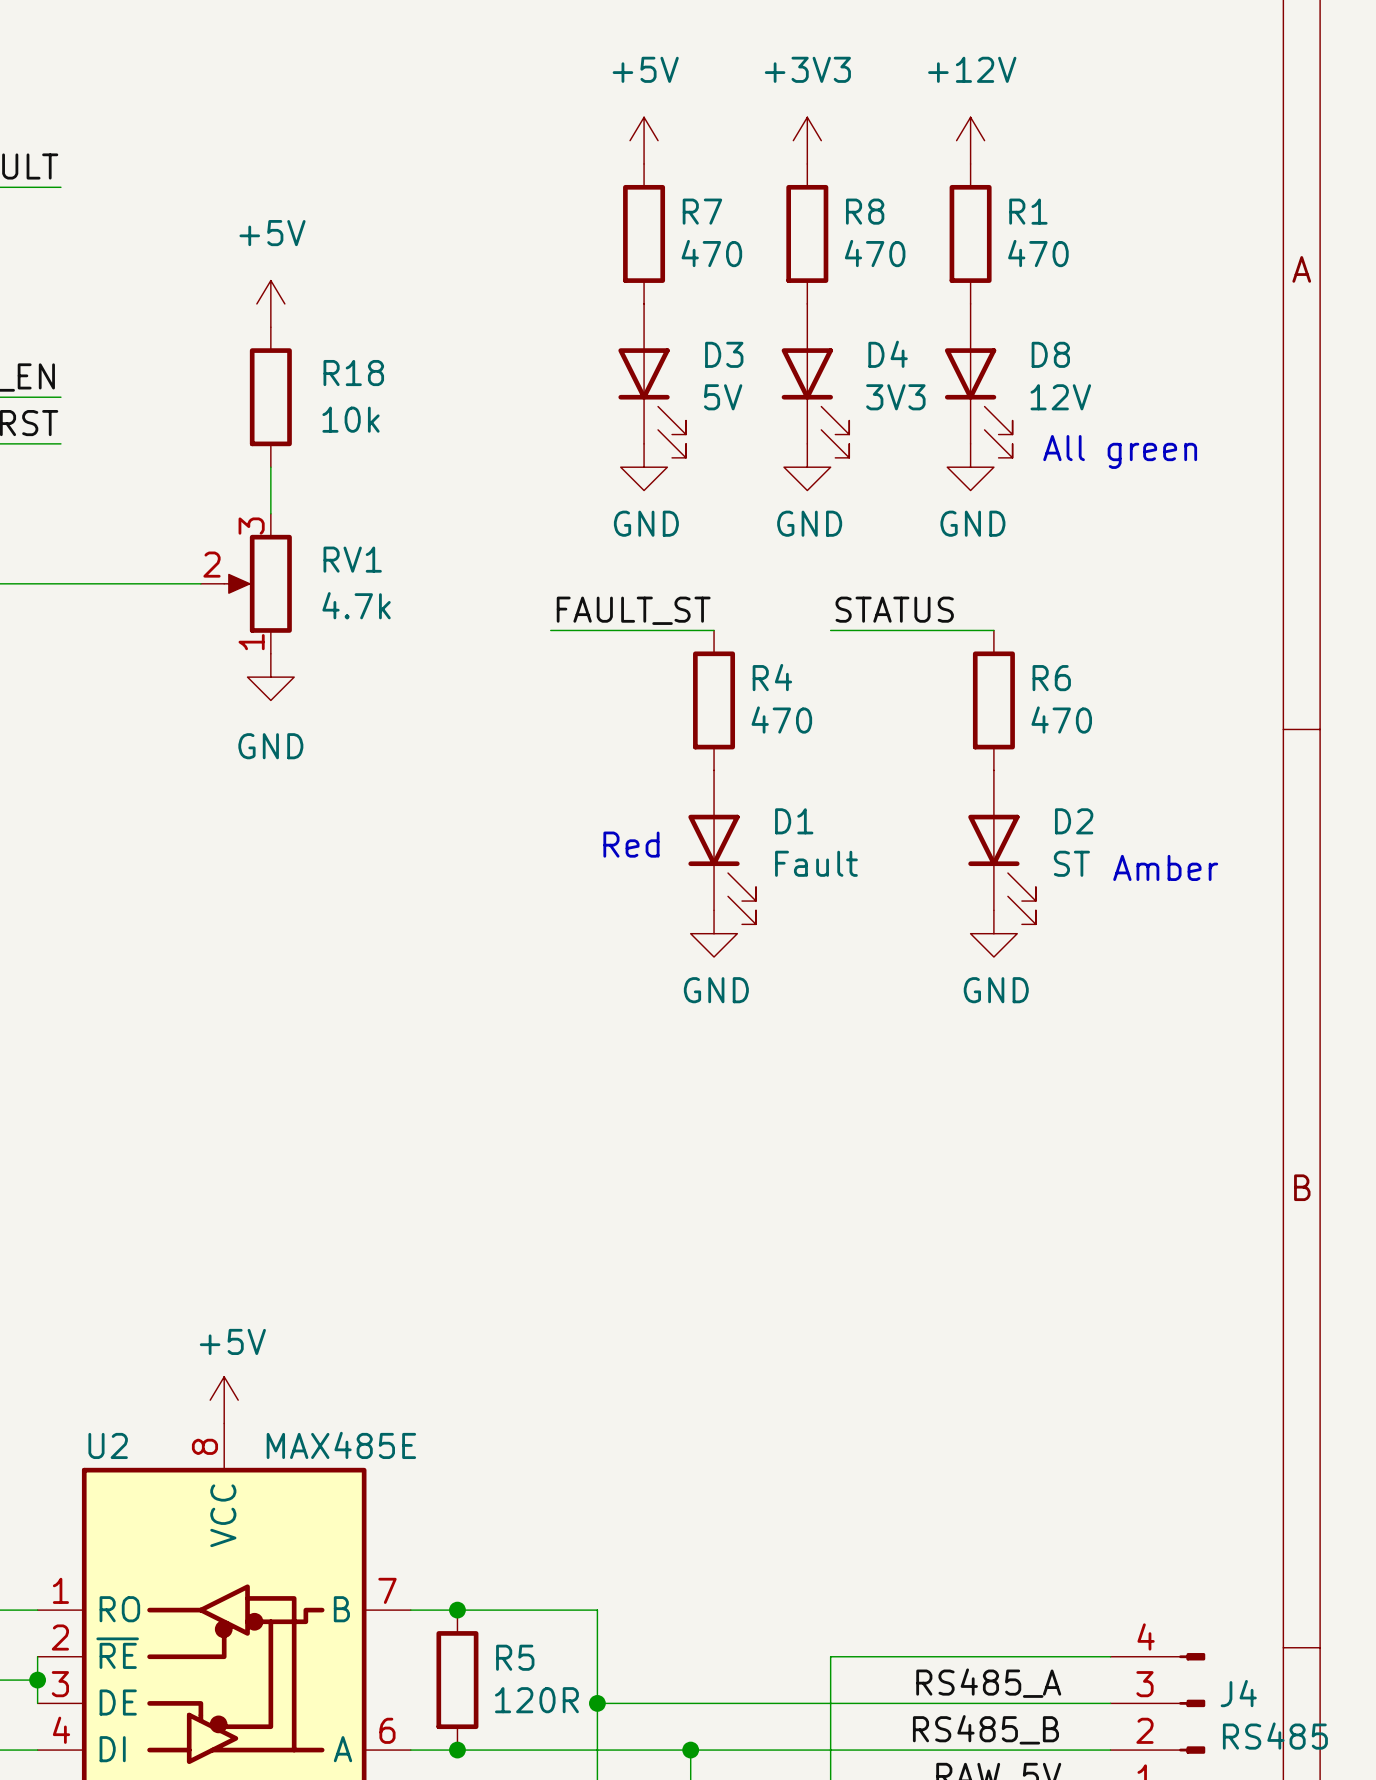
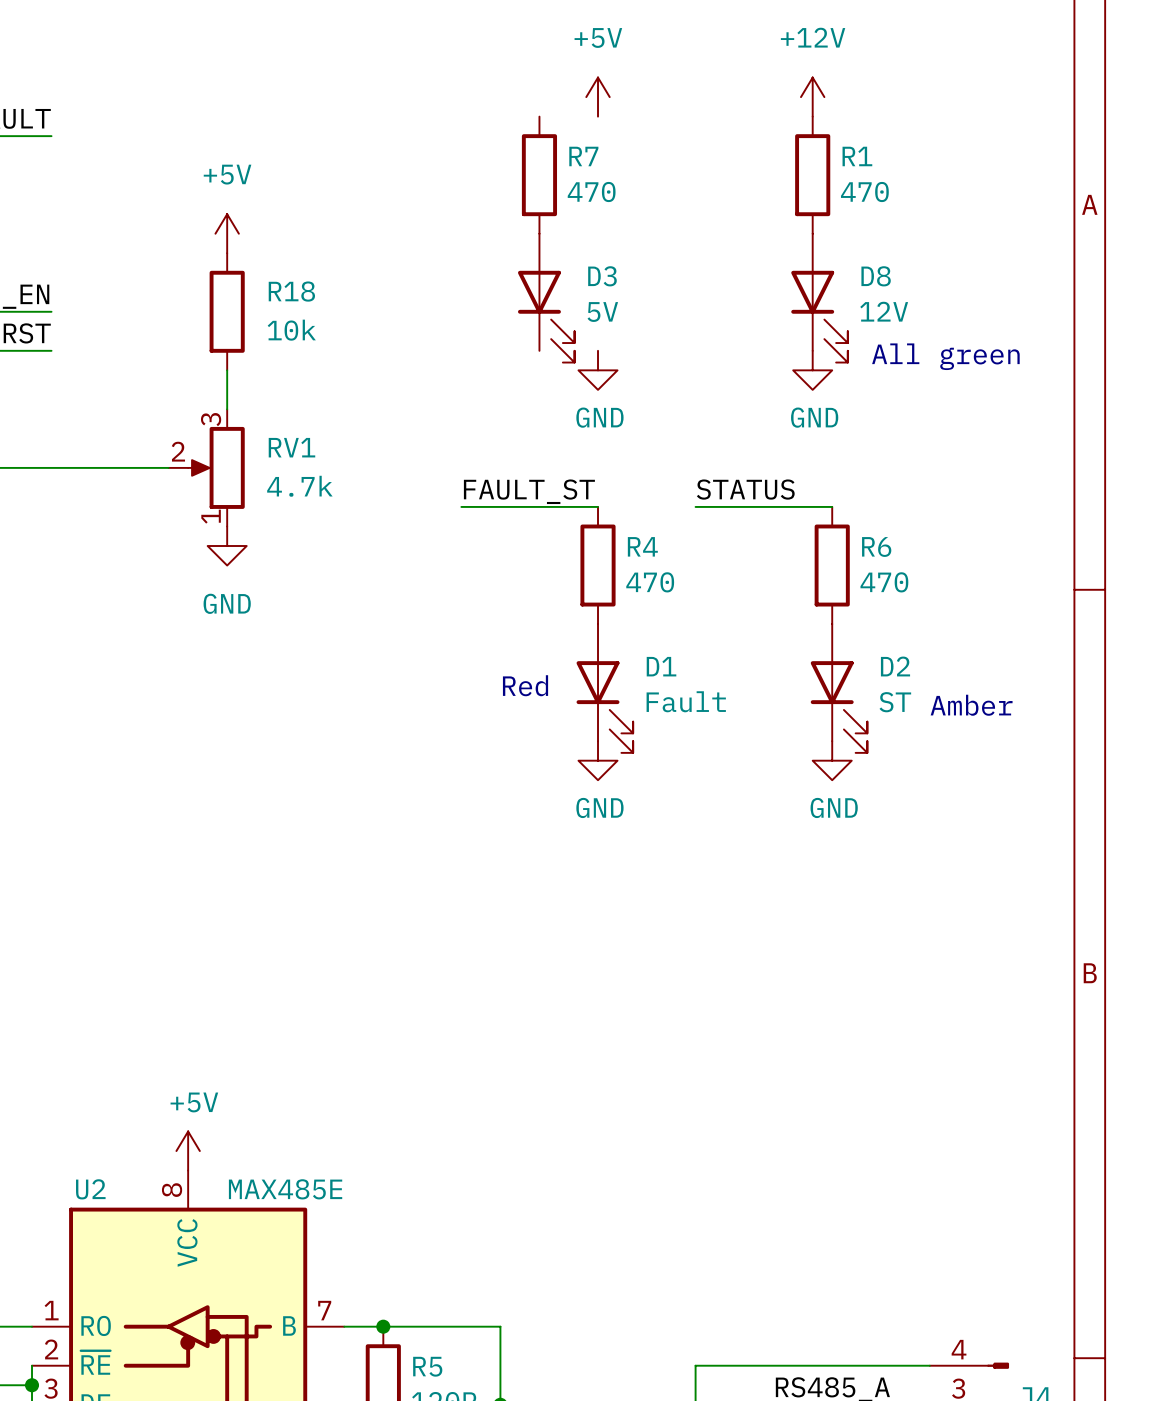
power symbol position: +5V (644, 140) -> +5V (598, 97)
power symbol: +3V3 (807, 140) -> none
R8: 470 (807, 233) -> none
D4: 3V3 (815, 380) -> none
power symbol: GND (644, 467) -> none
power symbol: none -> GND (598, 370)
power symbol: GND (807, 467) -> none

